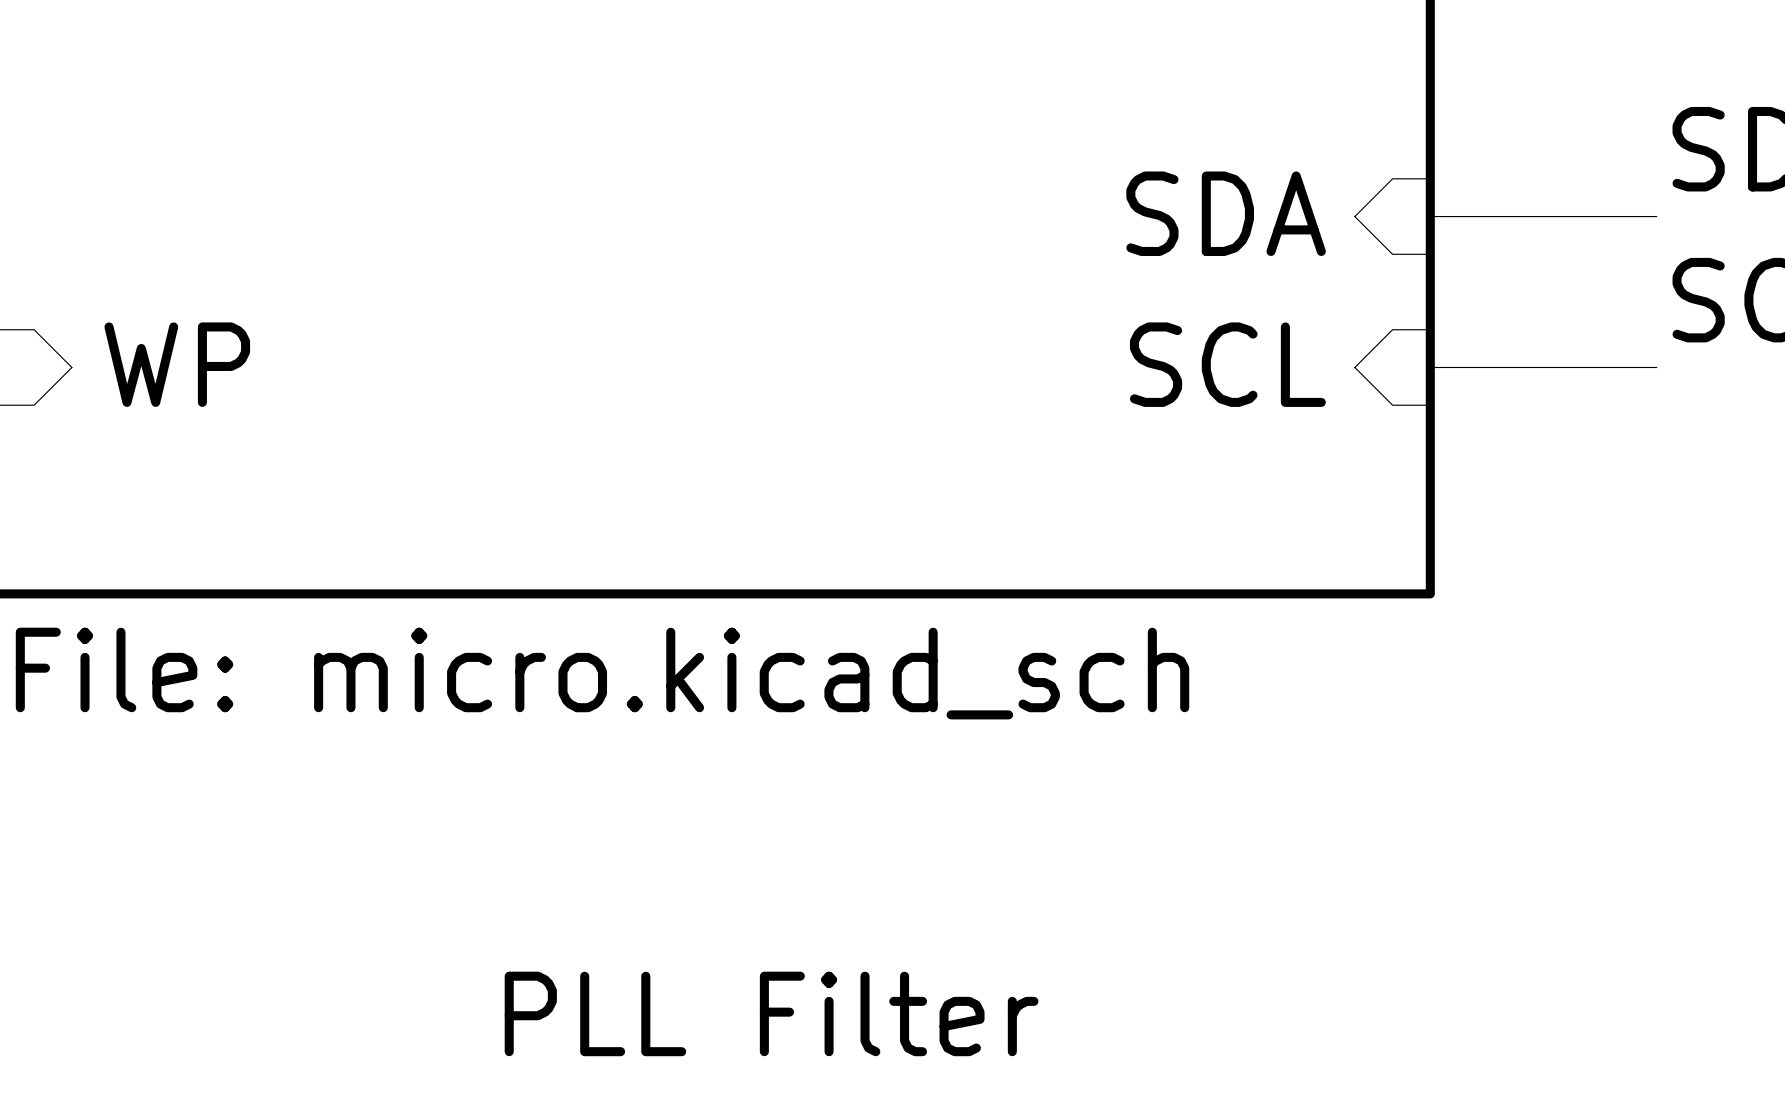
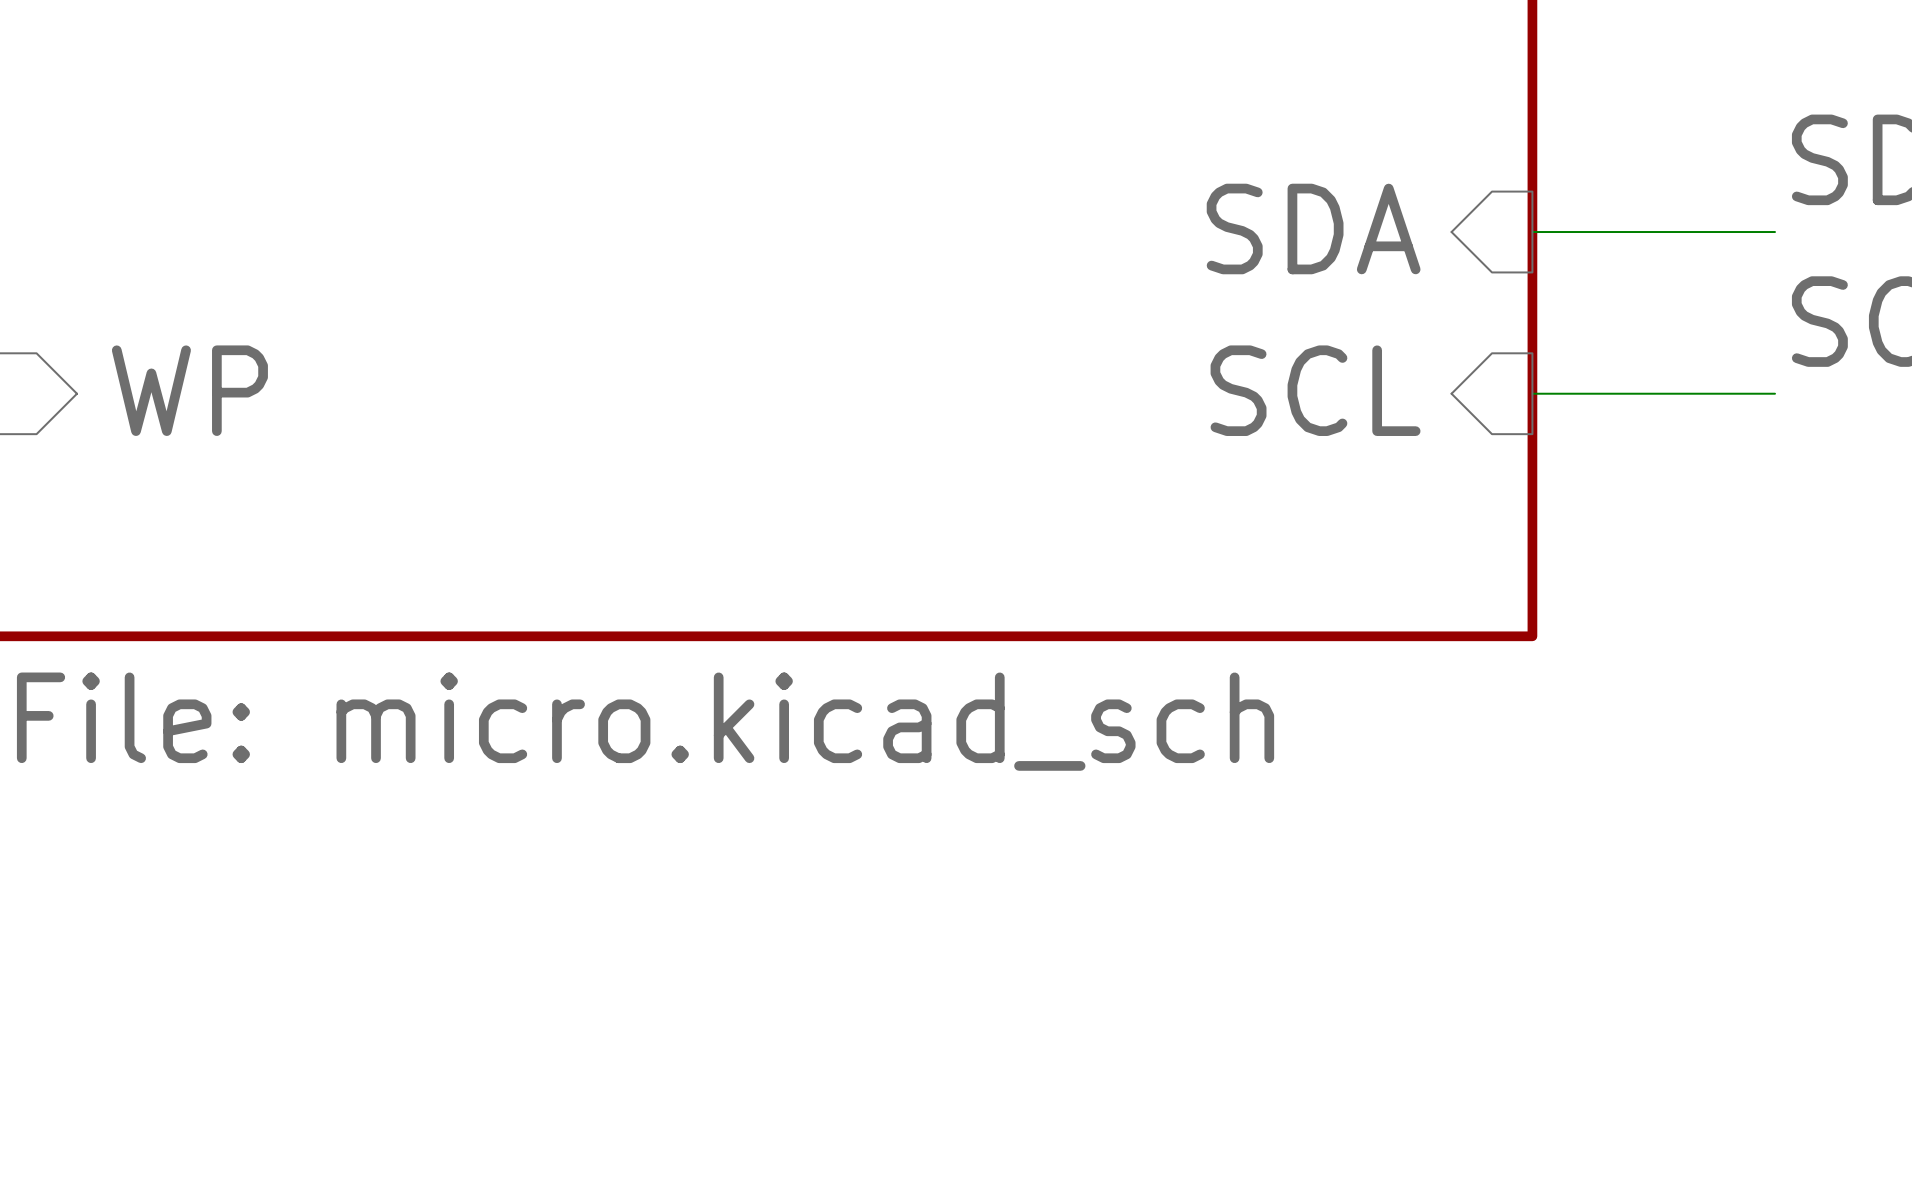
text: PLL Filter (771, 1013) -> none

